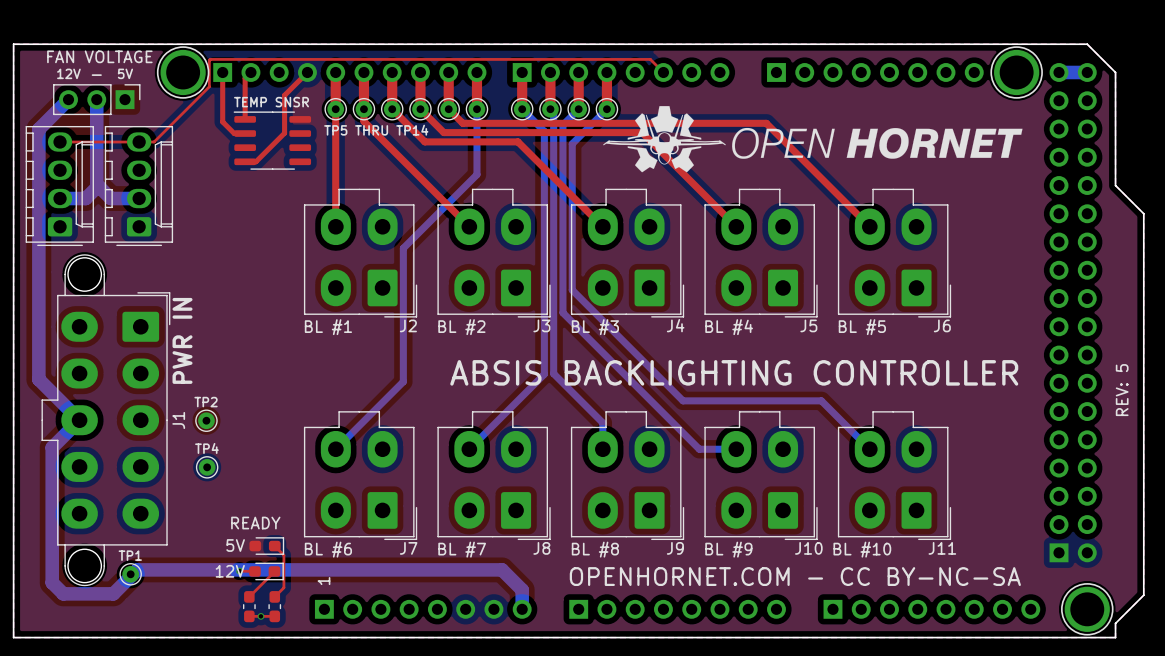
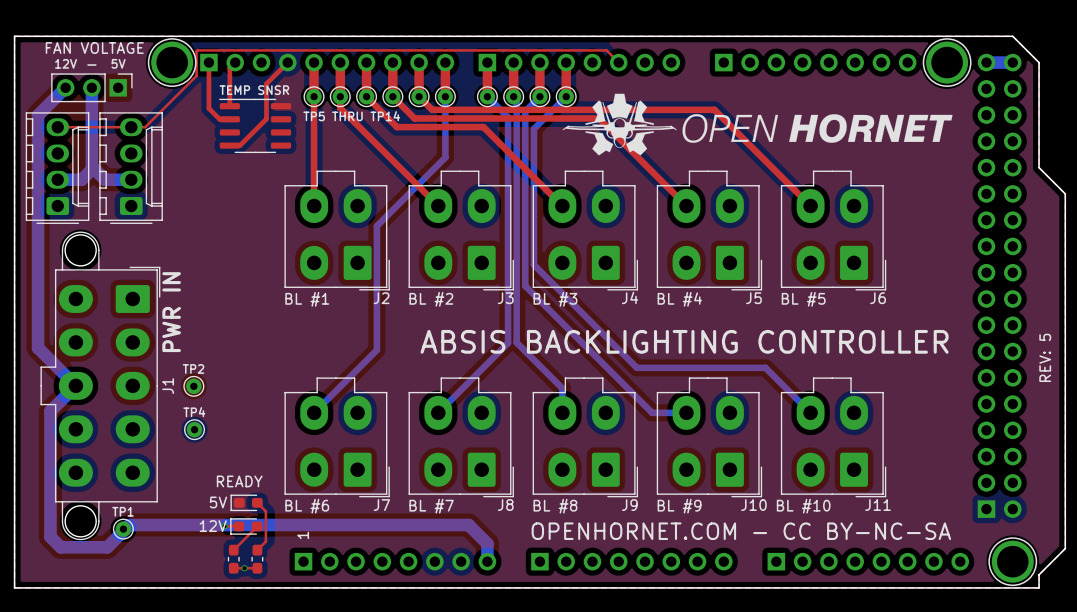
part rotation: 0° (266, 546) -> 180° (246, 502)
part rotation: 0° (266, 571) -> 180° (246, 526)

